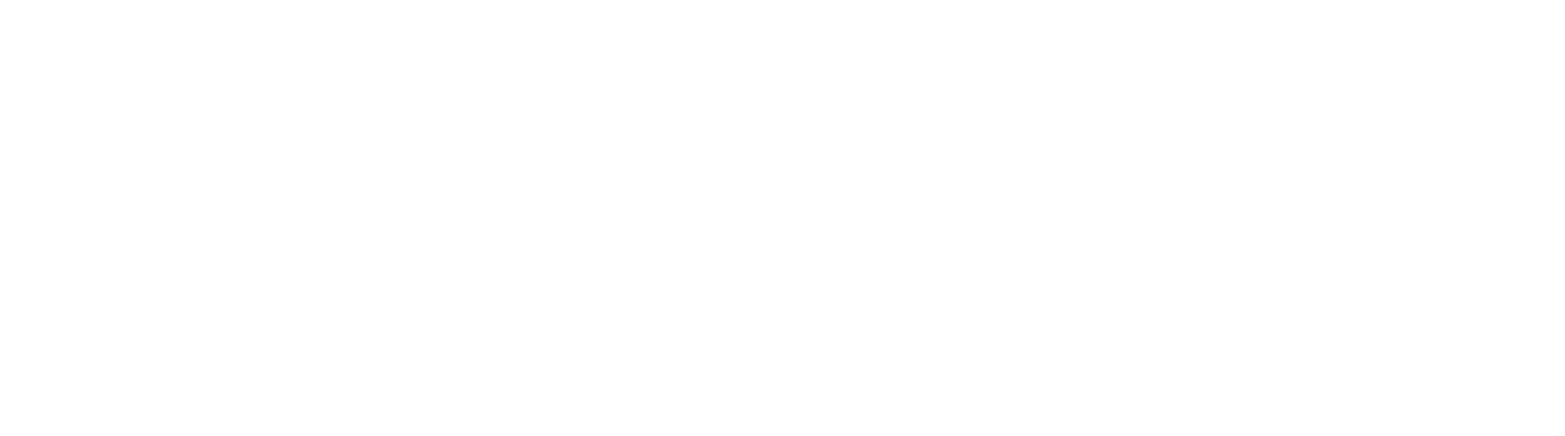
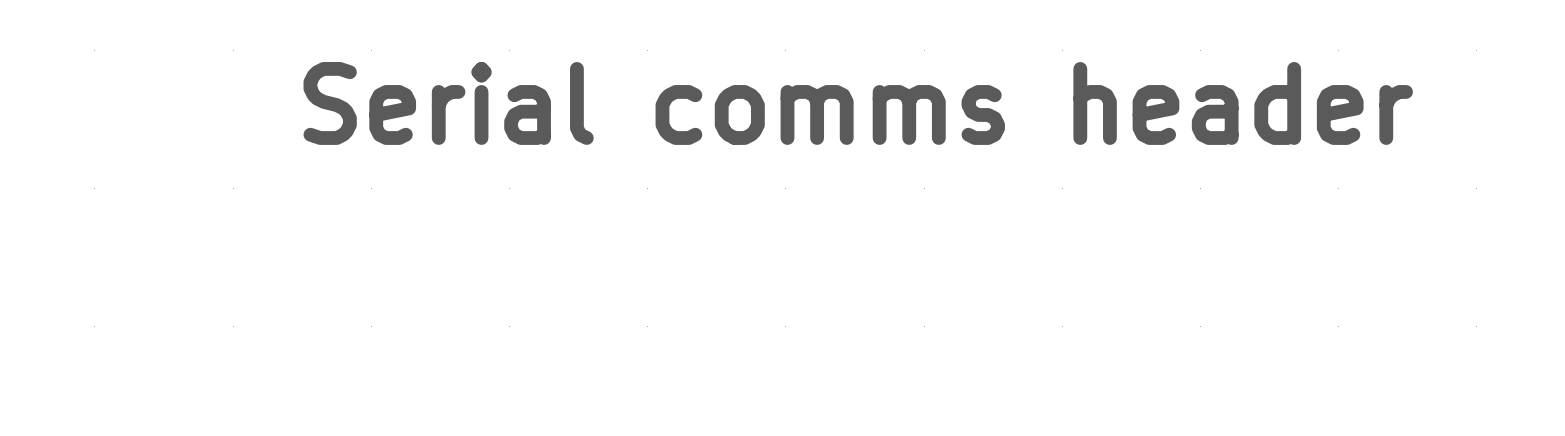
text: none -> Serial comms header (858, 103)

